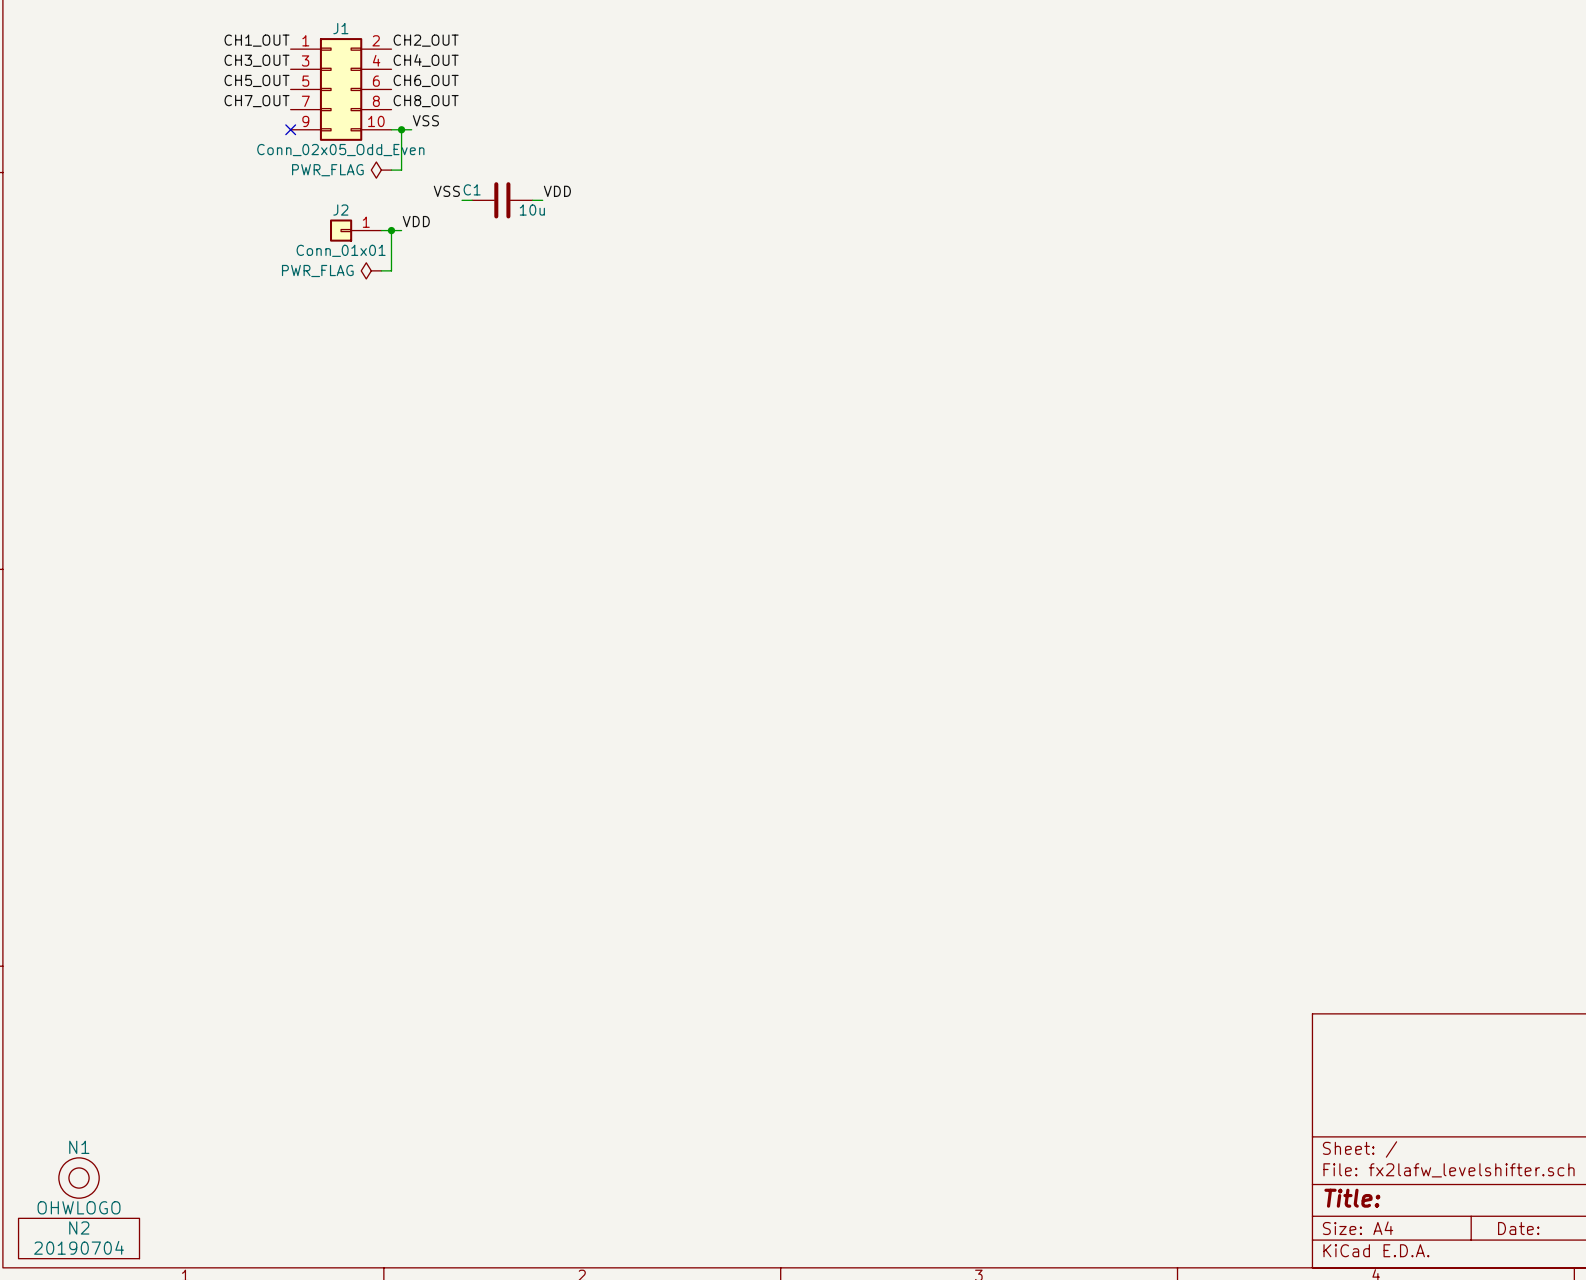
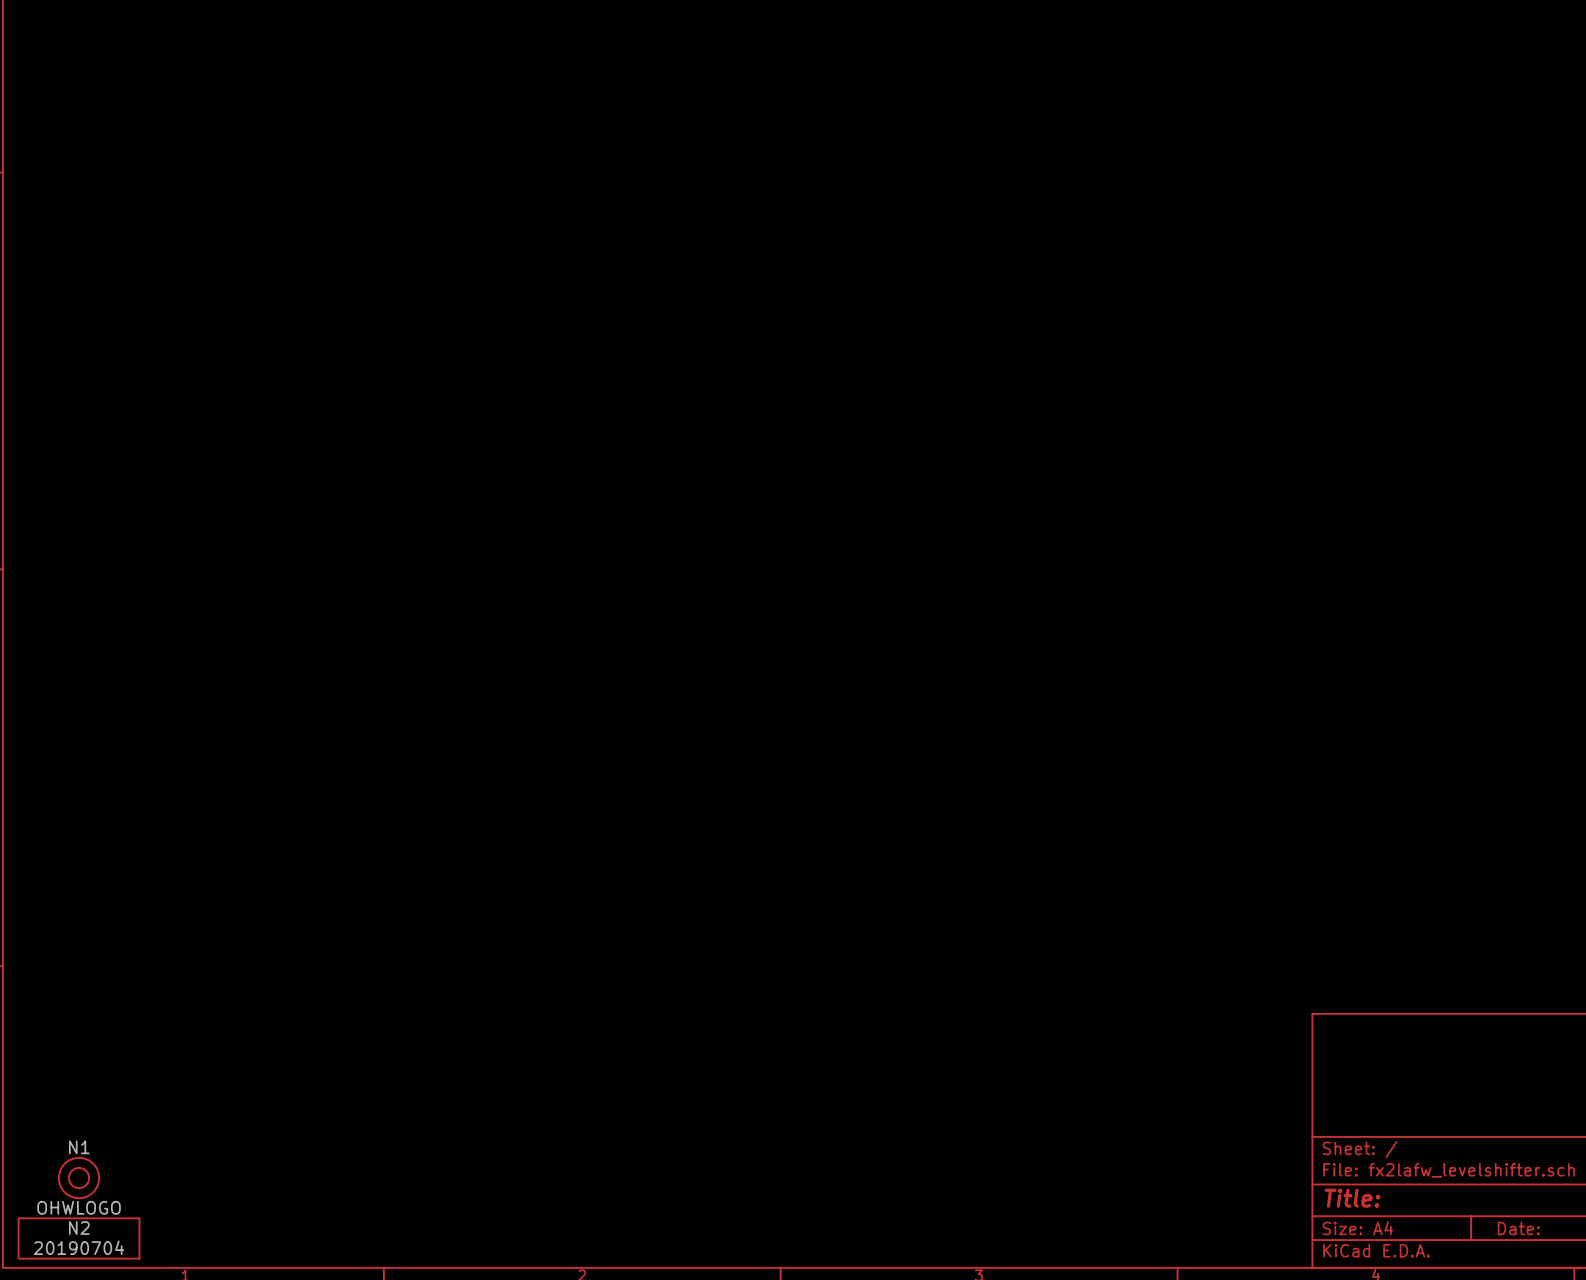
label: CH1_OUT (257, 40) -> none
label: CH2_OUT (426, 40) -> none
label: CH3_OUT (257, 60) -> none
label: CH4_OUT (426, 60) -> none
label: CH5_OUT (257, 80) -> none
label: CH6_OUT (426, 80) -> none
J1: Conn_02x05_Odd_Even (341, 89) -> none
label: CH7_OUT (257, 101) -> none
label: CH8_OUT (426, 101) -> none
label: VSS (425, 120) -> none
no-connect mark: (290, 129) -> none
wire: (391, 129) (411, 129) -> none
wire: (401, 129) (401, 170) (391, 170) -> none
junction: (401, 129) -> none
power symbol: PWR_FLAG (381, 170) -> none
label: VSS (446, 191) -> none
label: VDD (557, 191) -> none
wire: (462, 200) (472, 200) -> none
C1: 10u (502, 200) -> none
wire: (532, 200) (542, 200) -> none
label: VDD (416, 221) -> none
J2: Conn_01x01 (355, 230) -> none
wire: (381, 230) (401, 230) -> none
wire: (391, 230) (391, 270) (381, 270) -> none
junction: (391, 230) -> none
power symbol: PWR_FLAG (371, 270) -> none

